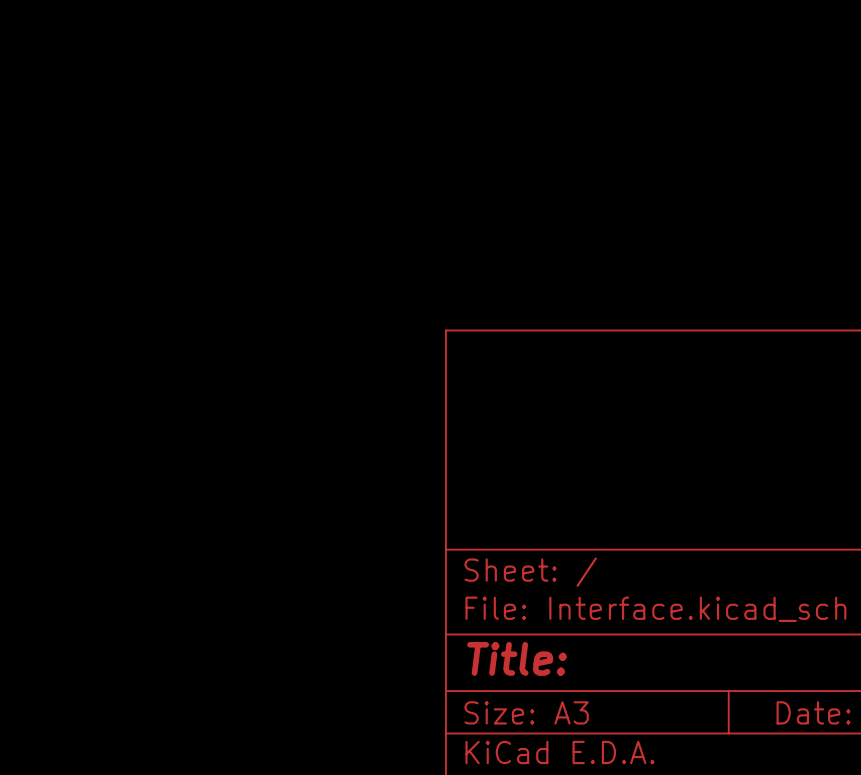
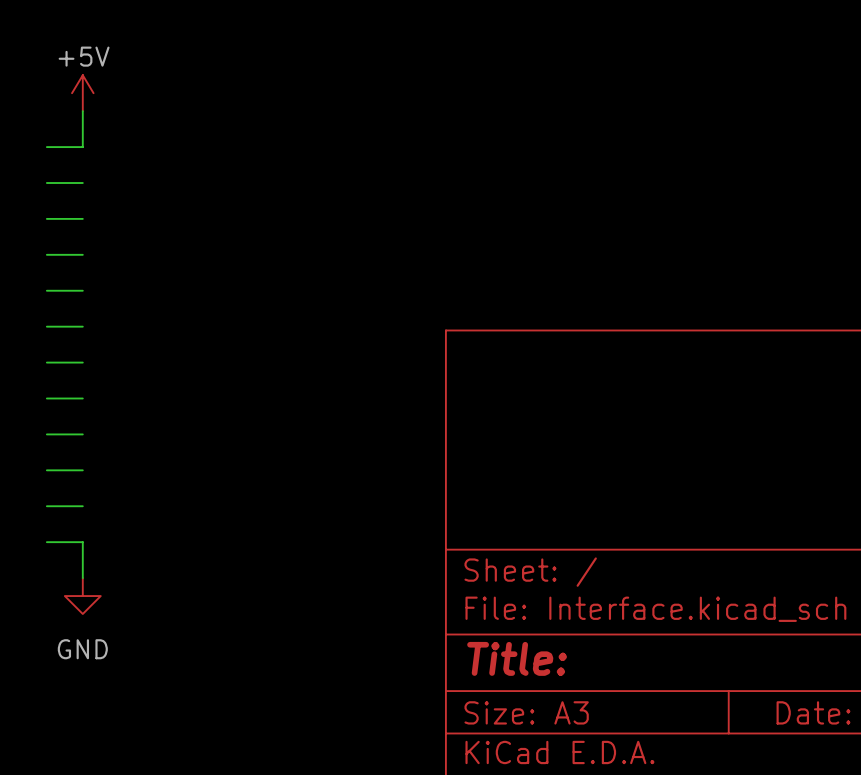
power symbol: none -> +5V (82, 93)
wire: none -> (82, 111) (82, 147) (46, 147)
wire: none -> (46, 183) (82, 183)
wire: none -> (46, 218) (82, 218)
wire: none -> (46, 254) (82, 254)
wire: none -> (46, 290) (82, 290)
wire: none -> (46, 326) (82, 326)
wire: none -> (46, 362) (82, 362)
wire: none -> (46, 398) (82, 398)
wire: none -> (46, 434) (82, 434)
wire: none -> (46, 470) (82, 470)
wire: none -> (46, 506) (82, 506)
wire: none -> (46, 542) (82, 542) (82, 578)
power symbol: none -> GND (82, 596)

